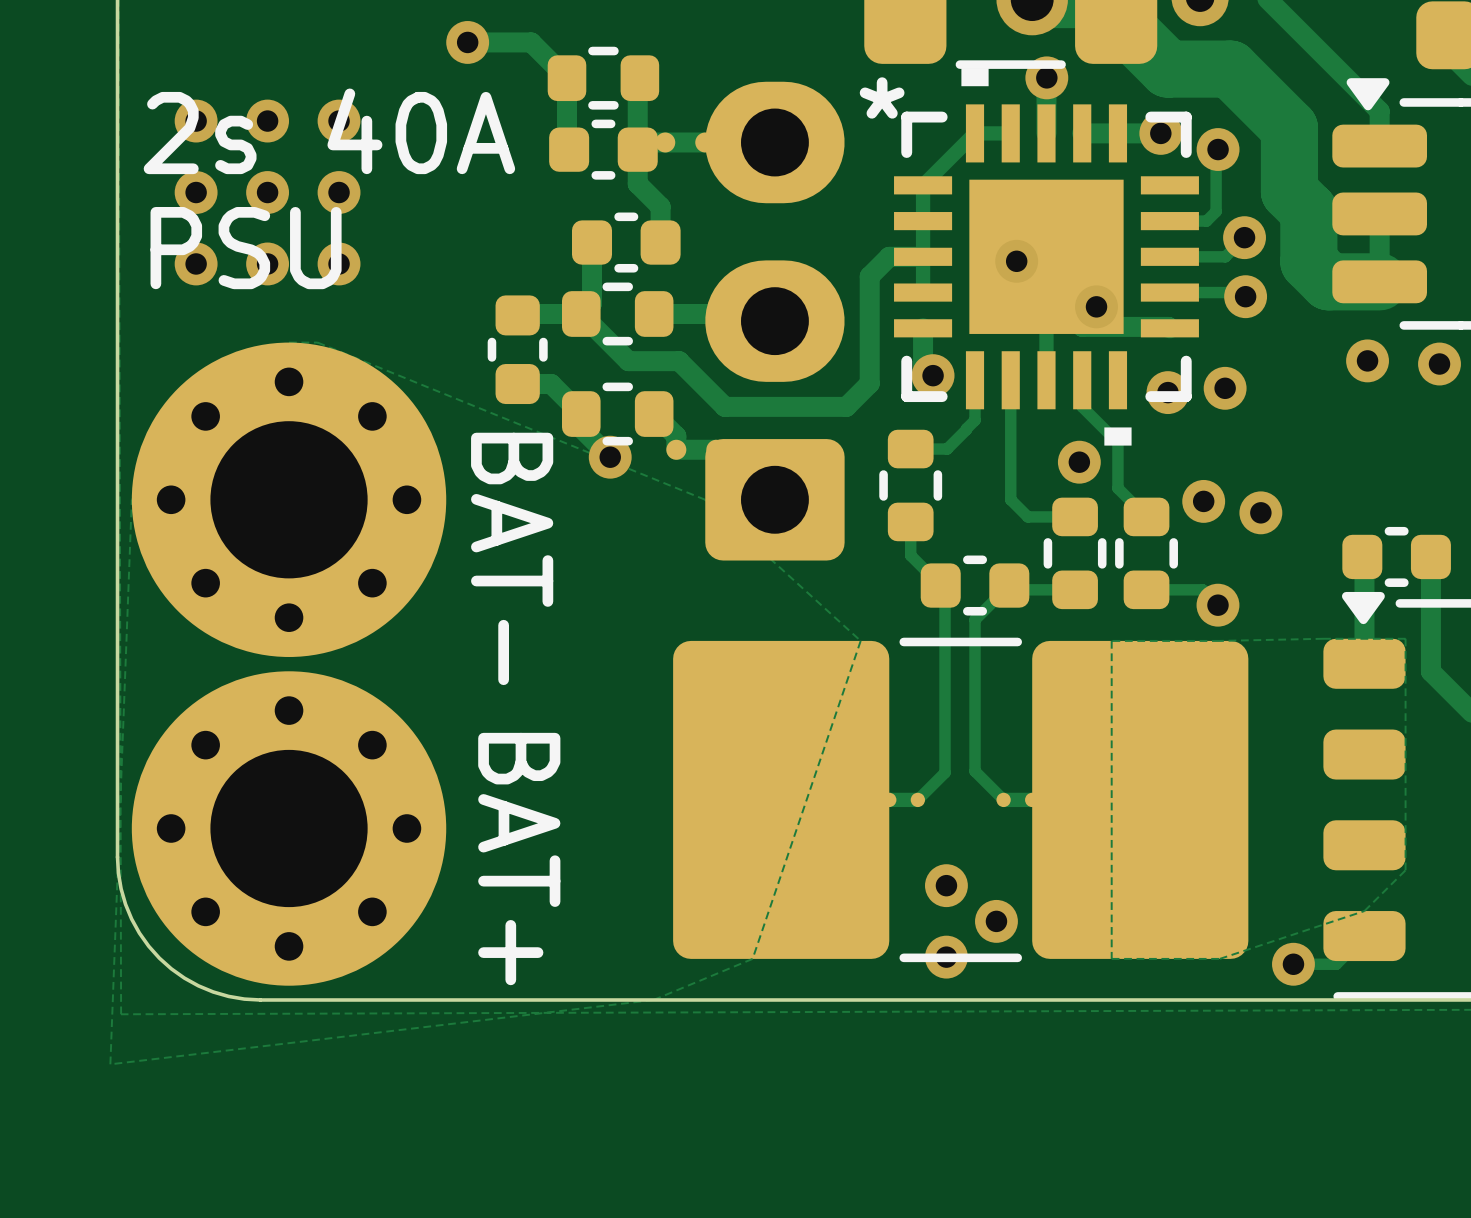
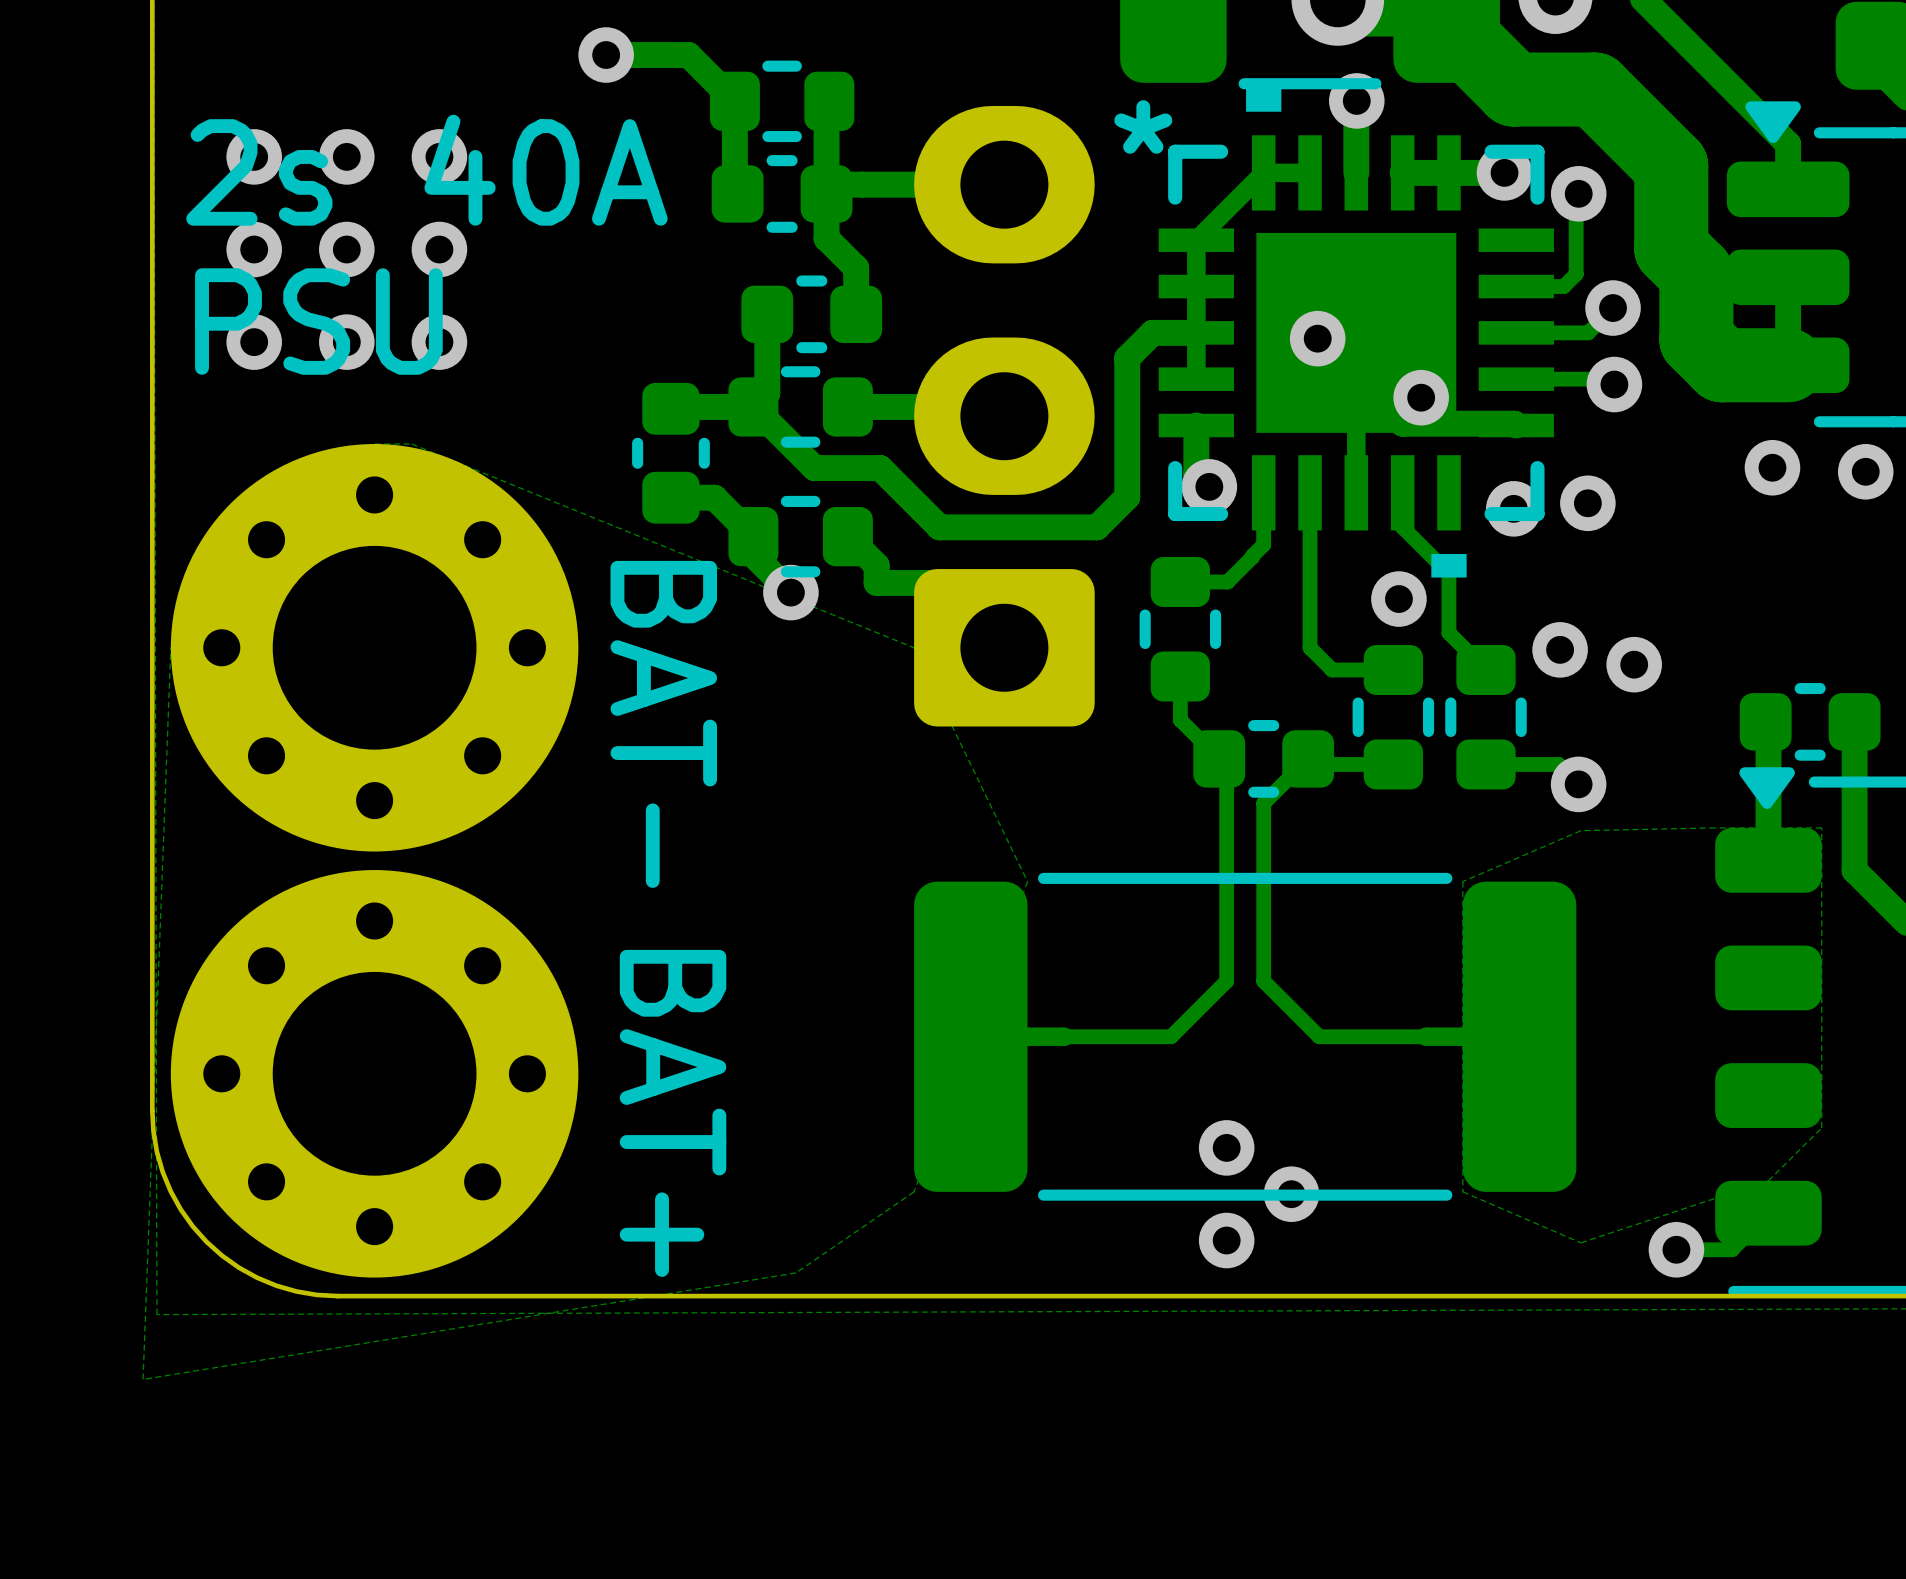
zone outline: (705, 499) (860, 640) (752, 958) (653, 999) (110, 1064) -> (914, 647) (1027, 881) (914, 1191) (796, 1272) (143, 1379)
track: (945, 589) (945, 772) (917, 799) -> (1224, 764) (1226, 766) (1226, 981) (1171, 1036) (1064, 1036)
part footprint: [673, 637, 1249, 963] -> [914, 872, 1577, 1201]
zone outline: (1219, 640) (1111, 640) (1111, 958) (1219, 958) -> (1580, 830) (1462, 881) (1462, 1191) (1580, 1242)
track: (975, 757) (975, 771) (1003, 799) -> (1263, 981) (1319, 1036) (1425, 1036)
part position: (903, 799) -> (1046, 1036)
part position: (1017, 799) -> (1444, 1036)

